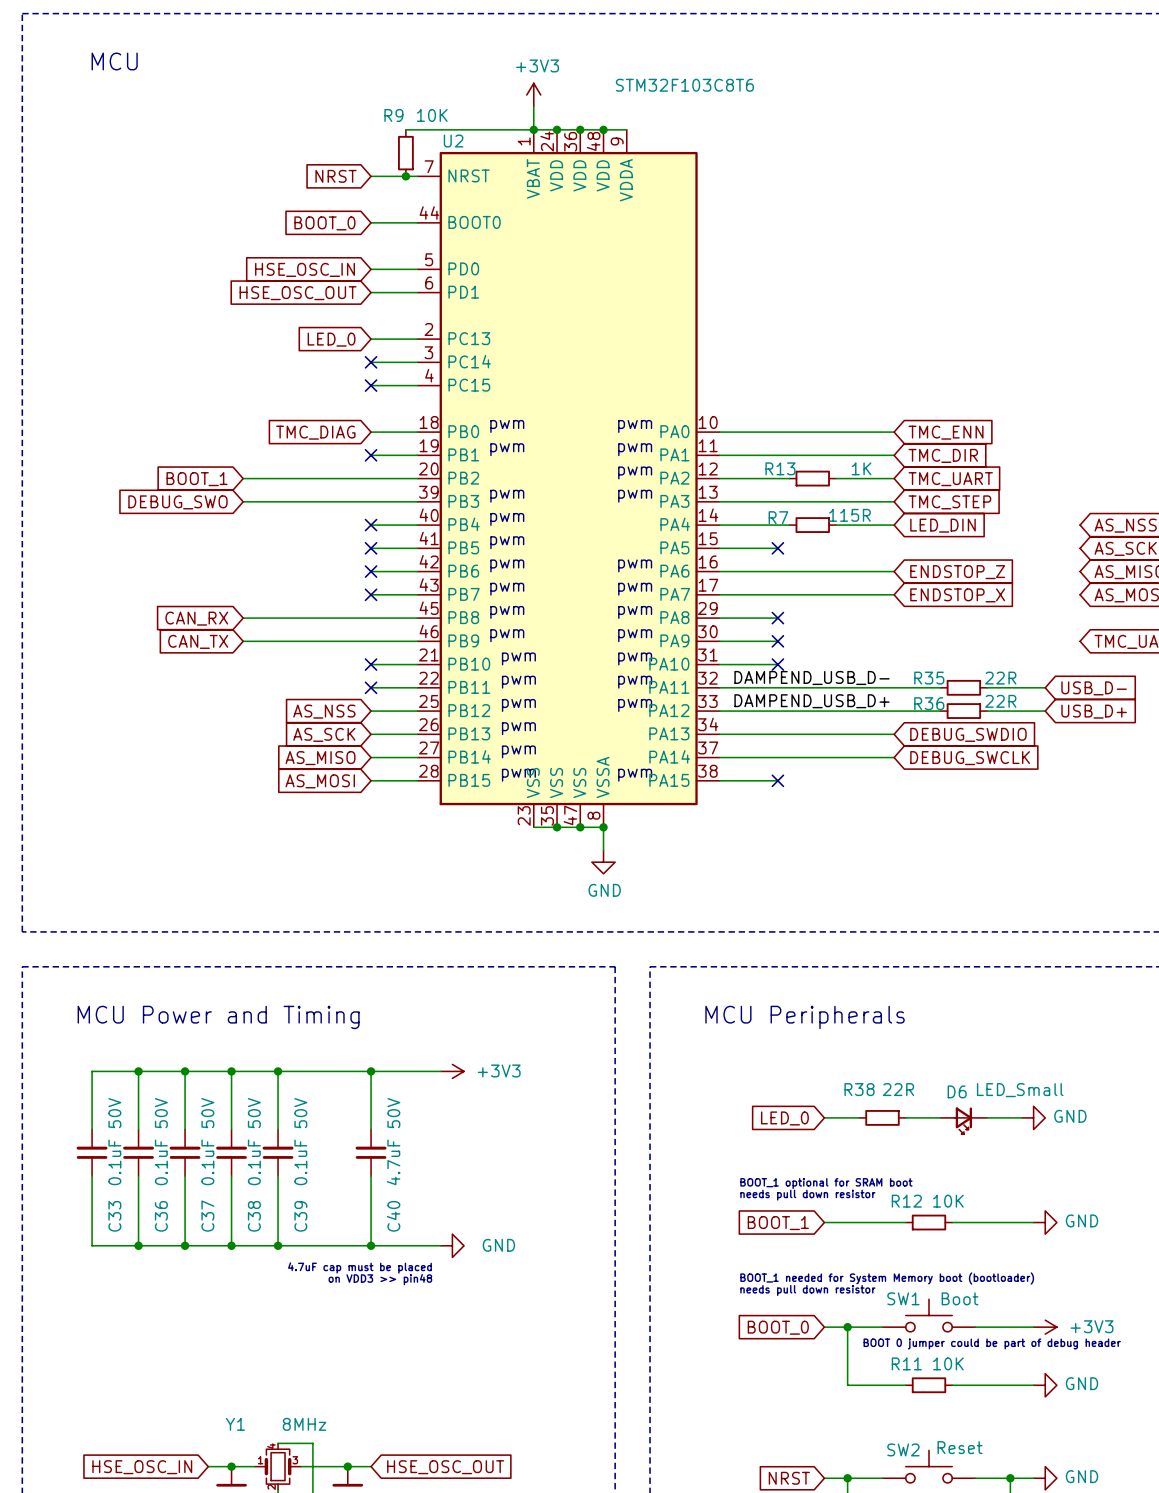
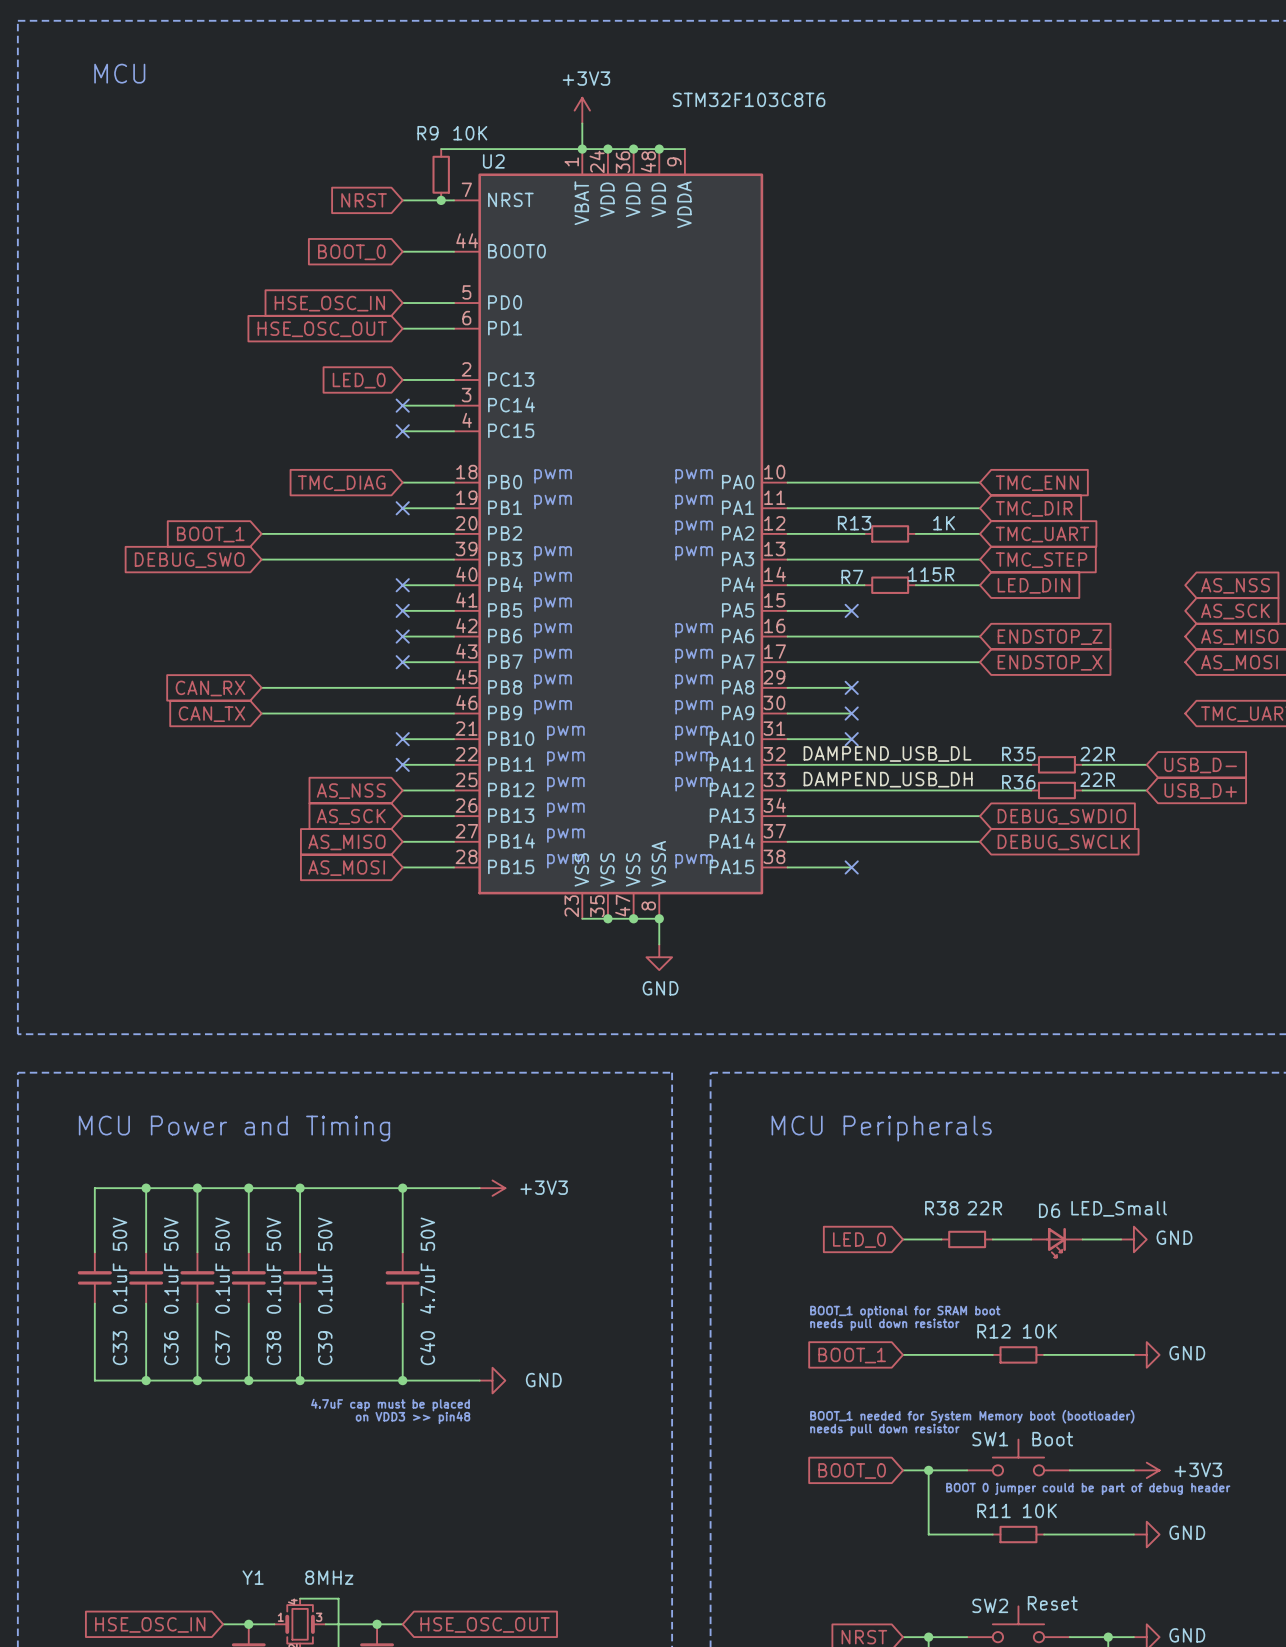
label: DAMPEND_USB_D- (812, 678) -> DAMPEND_USB_DL (887, 753)
label: DAMPEND_USB_D+ (812, 701) -> DAMPEND_USB_DH (888, 779)

